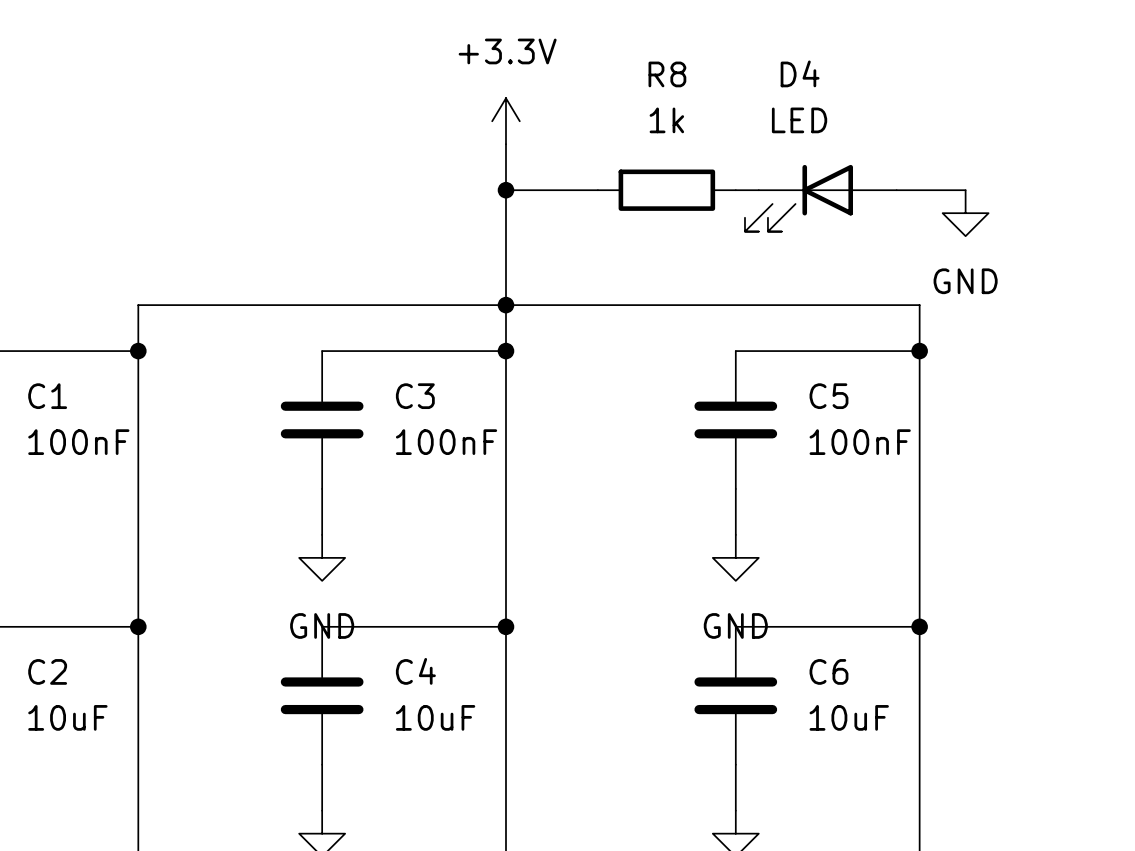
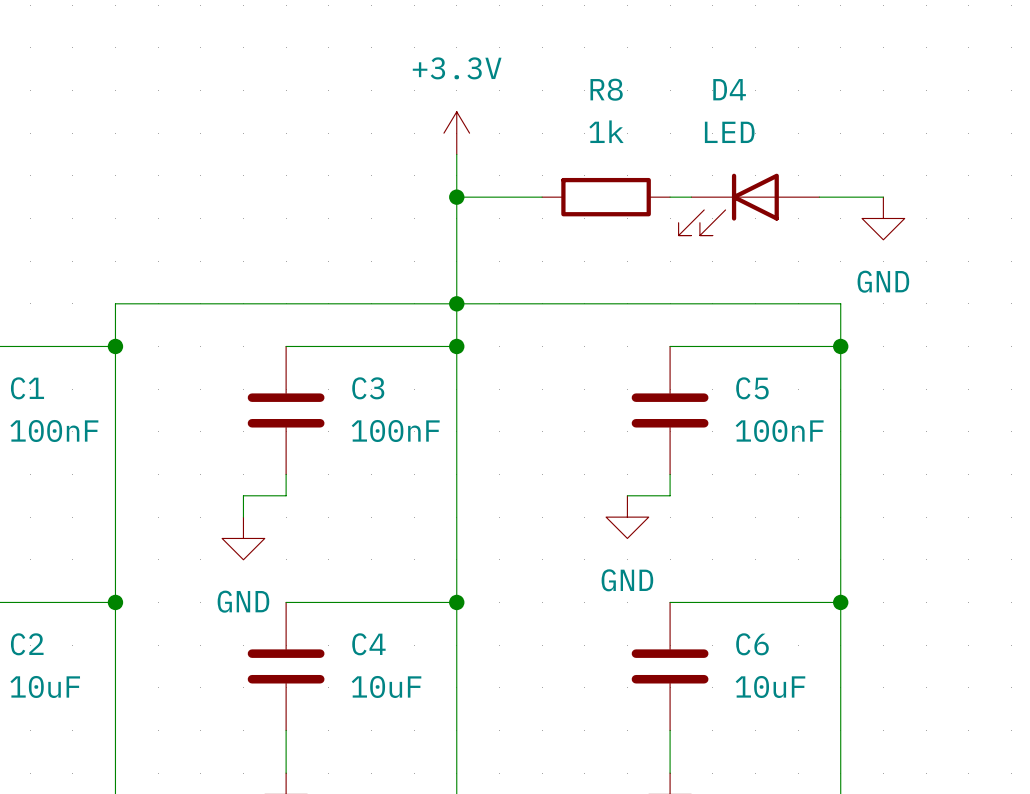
wire: (322, 511) (322, 534) -> (286, 495) (243, 495) (243, 517)
wire: (735, 511) (735, 534) -> (670, 495) (627, 495)
power symbol position: GND (322, 557) -> GND (243, 538)
power symbol position: GND (735, 557) -> GND (627, 517)

